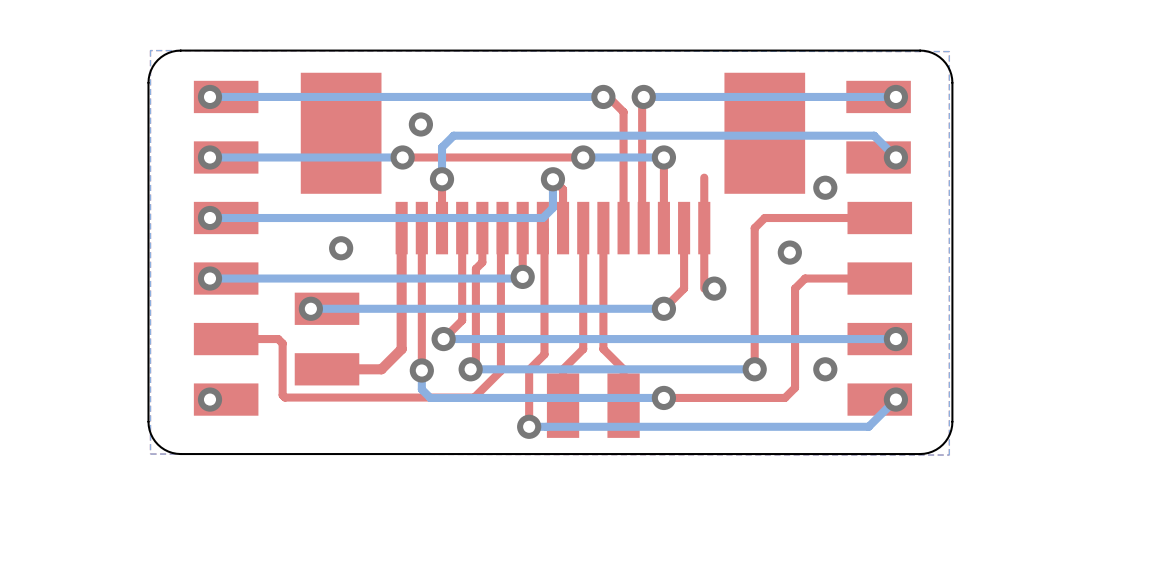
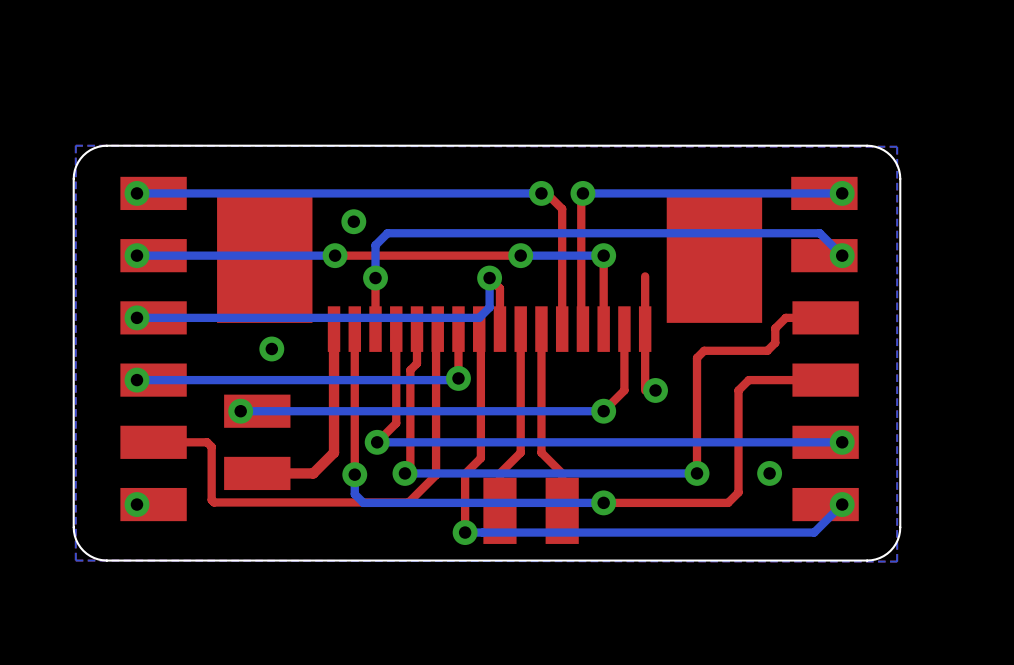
part footprint: [300, 72, 806, 255] -> [217, 194, 763, 352]
via: (825, 187) -> none
top track: (841, 218) (764, 218) (754, 228) (754, 256) -> (785, 317) (775, 328) (775, 342) (767, 350) (704, 350) (697, 357)
via: (789, 252) -> none

